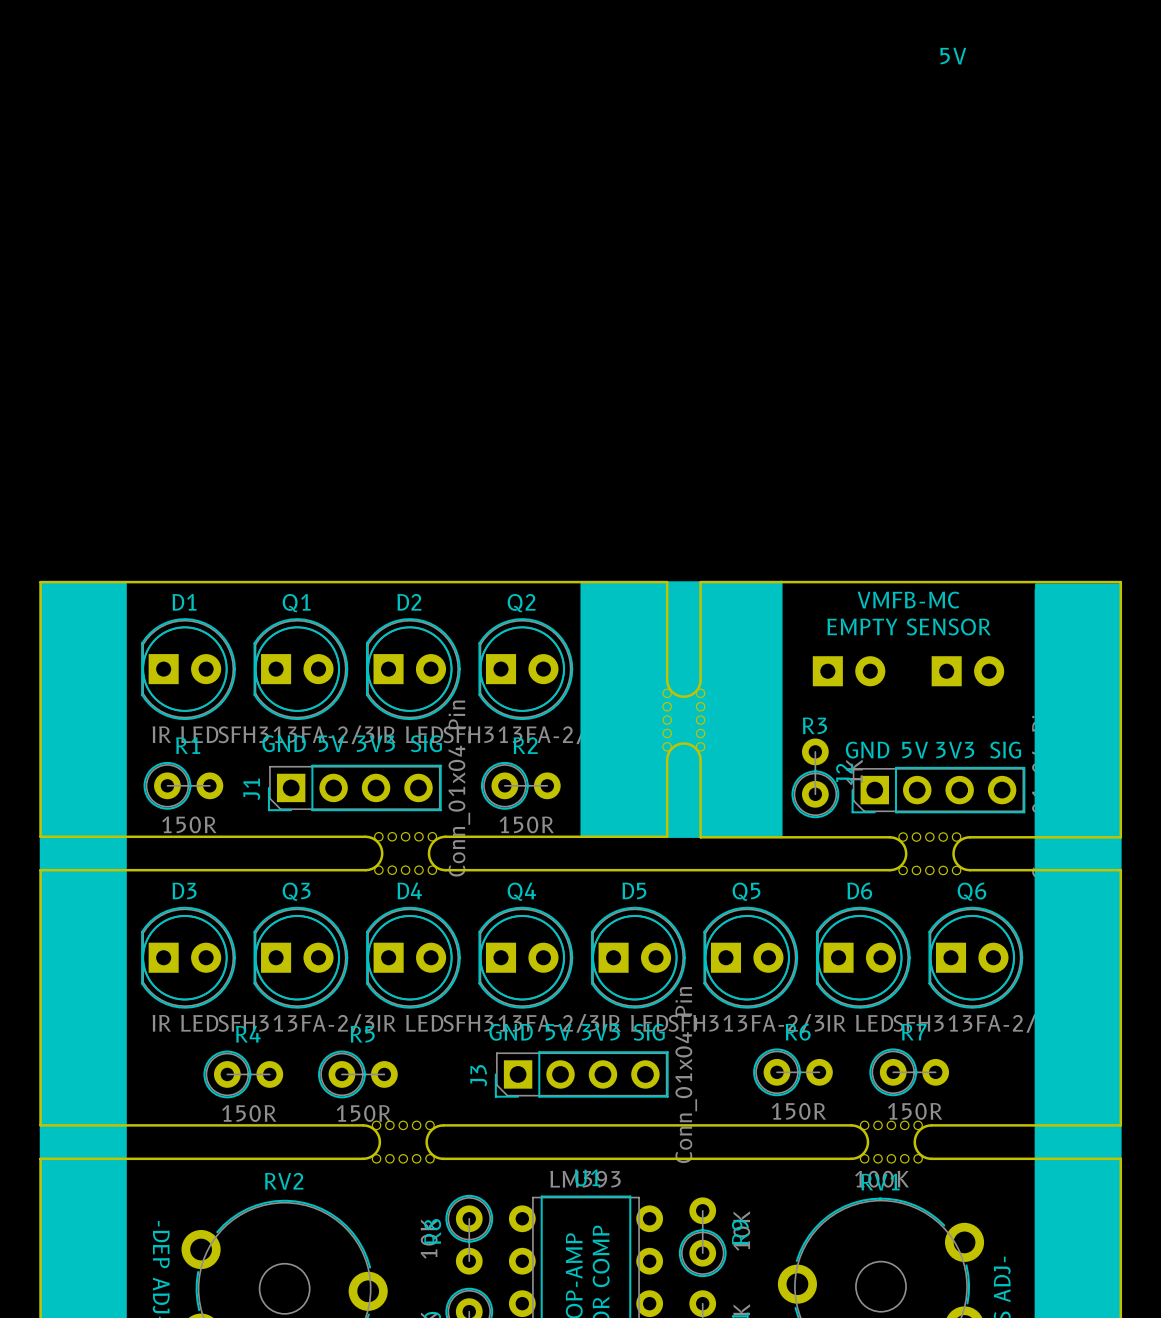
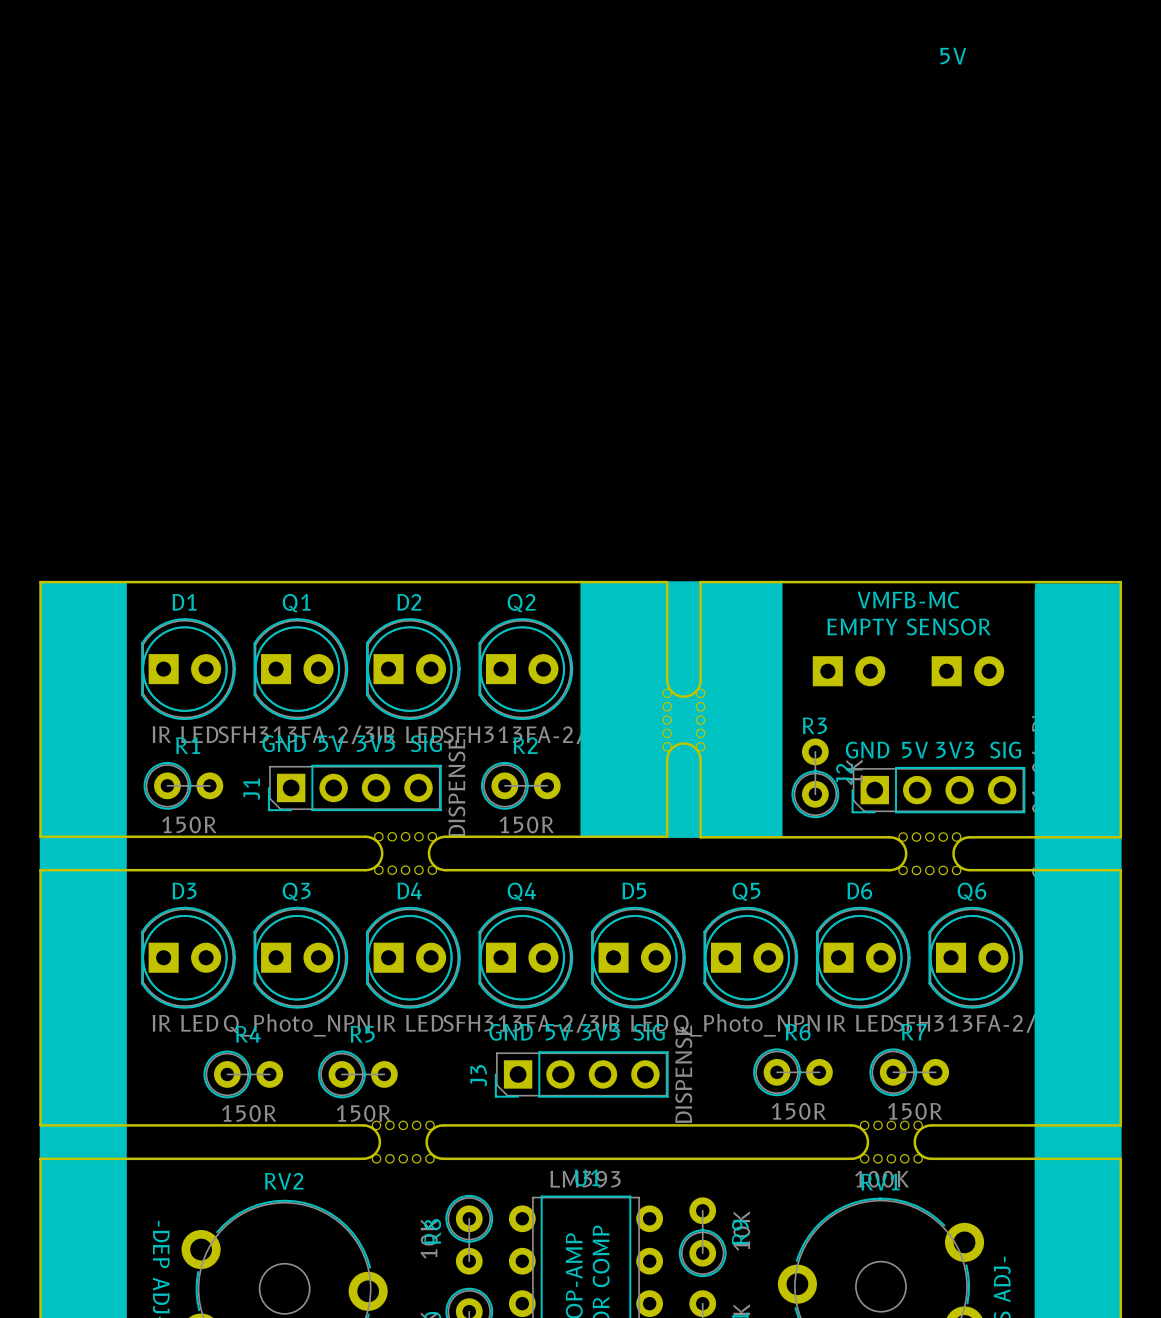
J1 value: Conn_01x04_Pin (459, 788) -> DISPENSE (456, 787)
Q3 value: SFH313FA-2/3 (296, 1023) -> Q_Photo_NPN (296, 1025)
Q5 value: SFH313FA-2/3 (746, 1023) -> Q_Photo_NPN (746, 1025)
J3 value: Conn_01x04_Pin (686, 1075) -> DISPENSE (683, 1074)

